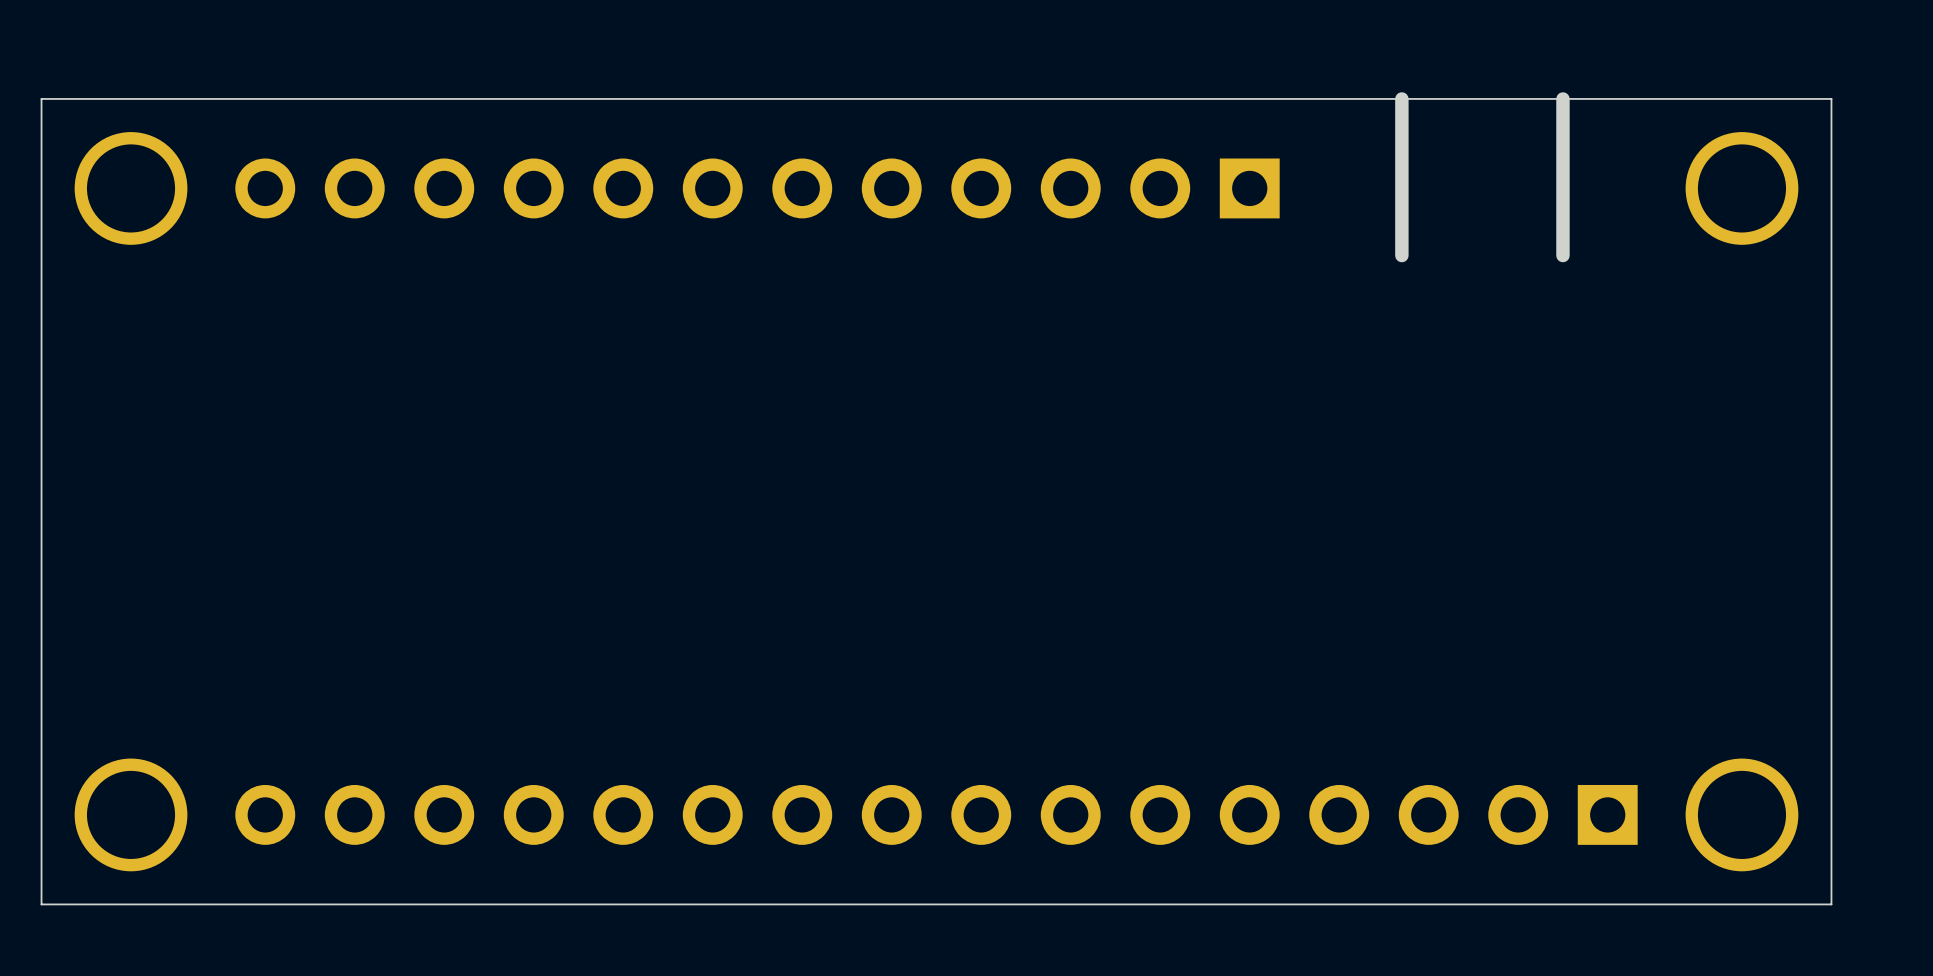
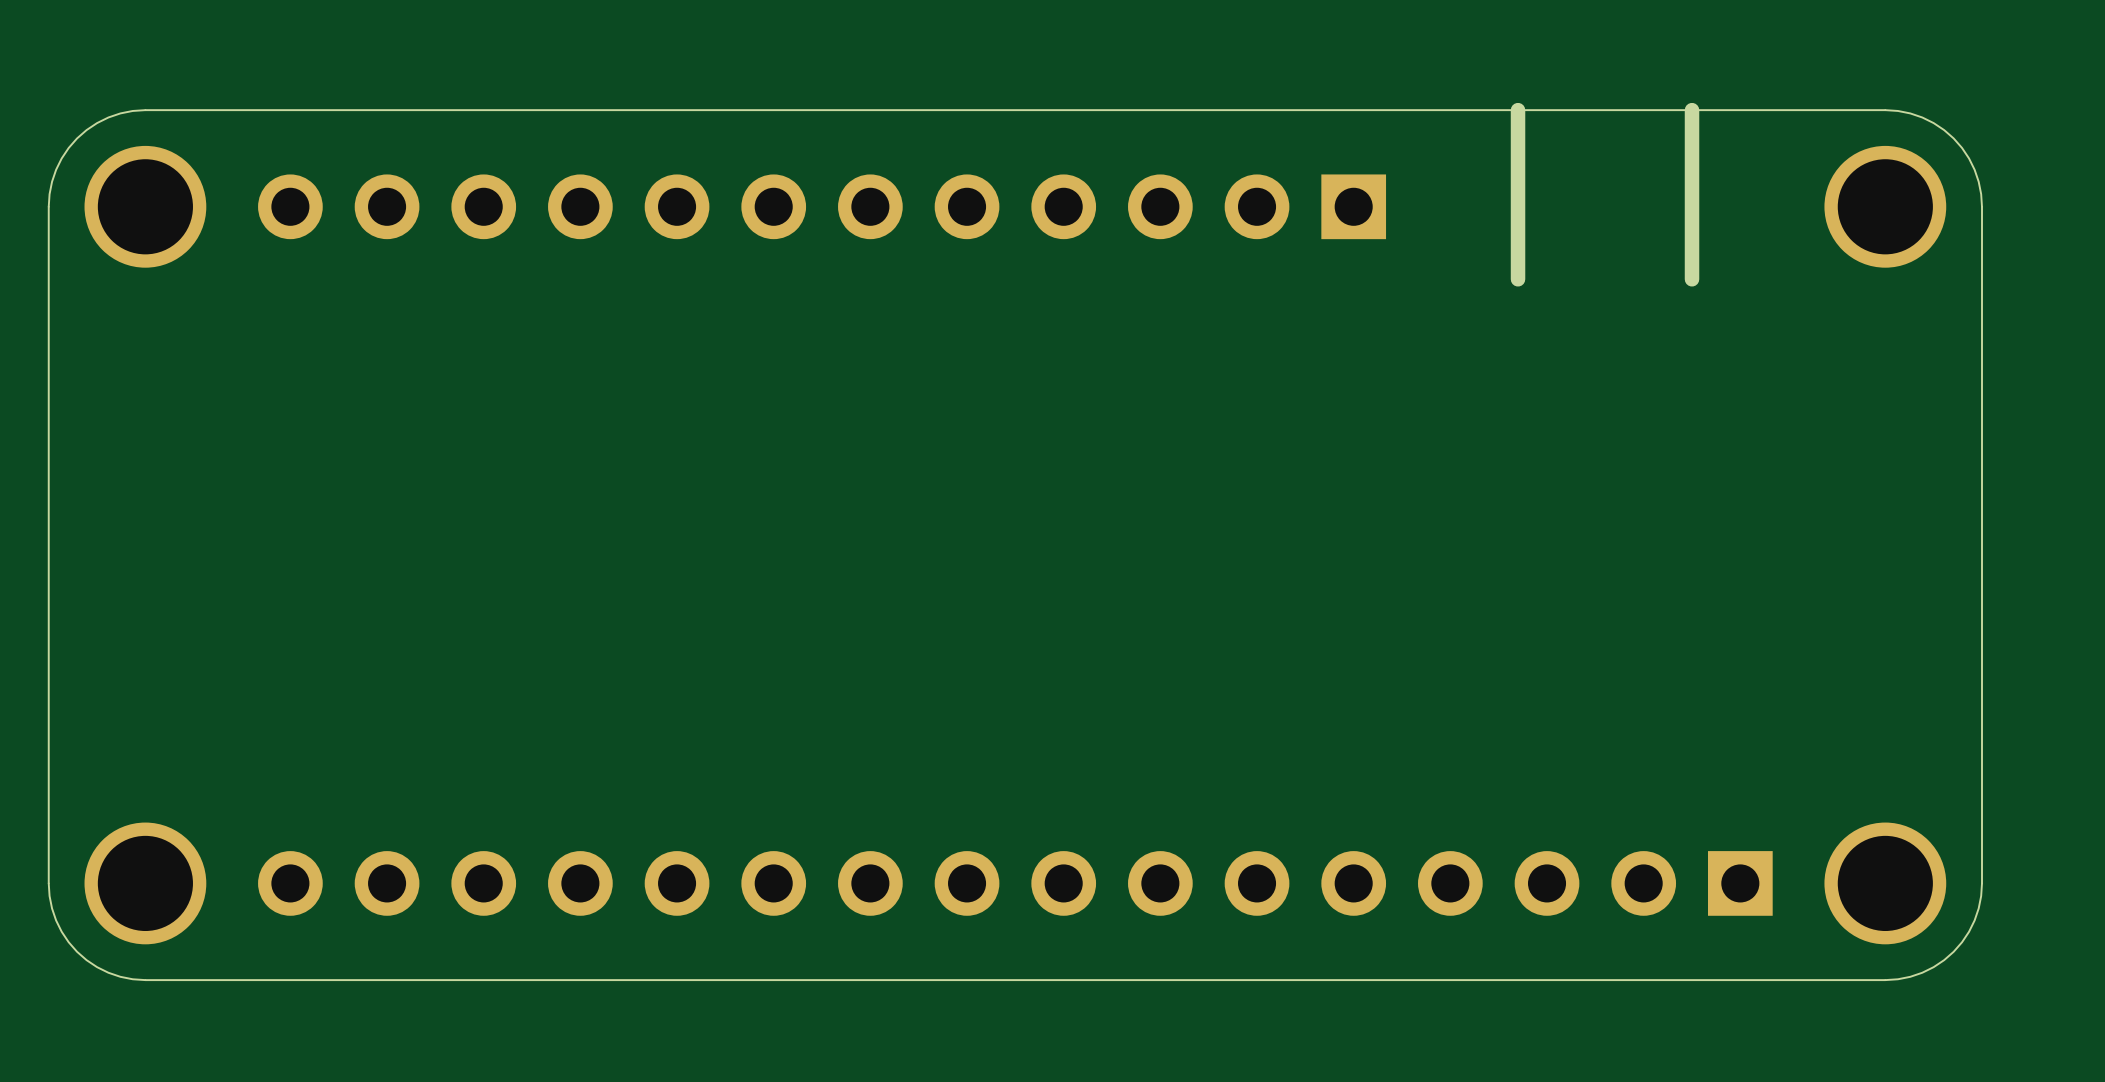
board edge: (131, 98) (41, 98) (41, 188) -> (145, 110) (120, 113) (108, 117) (97, 123) (77, 138) (61, 158) (56, 169) (52, 181) (48, 206)
board edge: (1741, 98) (1831, 98) (1831, 188) -> (1885, 110) (1910, 113) (1922, 117) (1933, 123) (1953, 138) (1969, 158) (1974, 169) (1981, 194) (1982, 206)
board edge: (41, 814) (41, 904) (131, 904) -> (48, 883) (52, 908) (56, 920) (68, 942) (77, 951) (86, 960) (108, 972) (120, 976) (145, 980)
board edge: (1831, 814) (1831, 904) (1741, 904) -> (1982, 883) (1978, 908) (1974, 920) (1962, 942) (1953, 951) (1944, 960) (1922, 972) (1897, 979) (1885, 980)

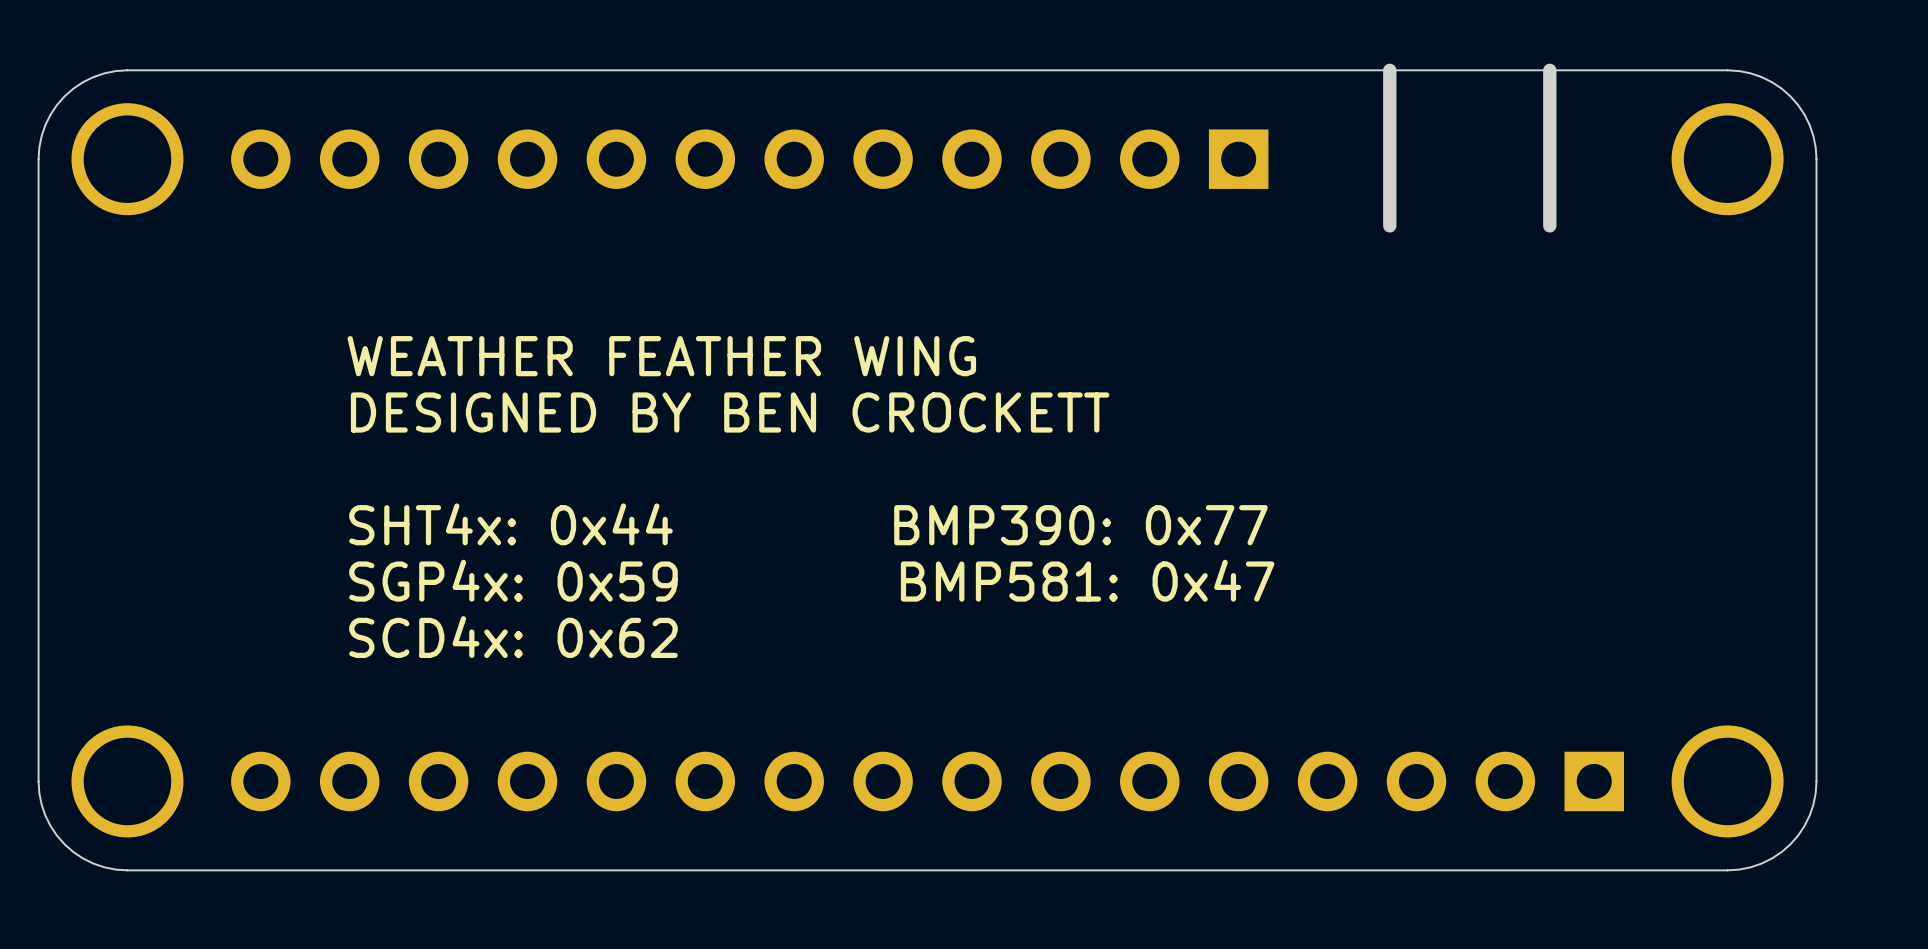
text: none -> WEATHER FEATHER WING (661, 356)
text: none -> DESIGNED BY BEN CROCKETT (730, 412)
text: none -> SHT4x: 0x44 BMP390: 0x77 (808, 524)
text: none -> SGP4x: 0x59 BMP581: 0x47 (811, 580)
text: none -> SCD4x: 0x62 (513, 637)

